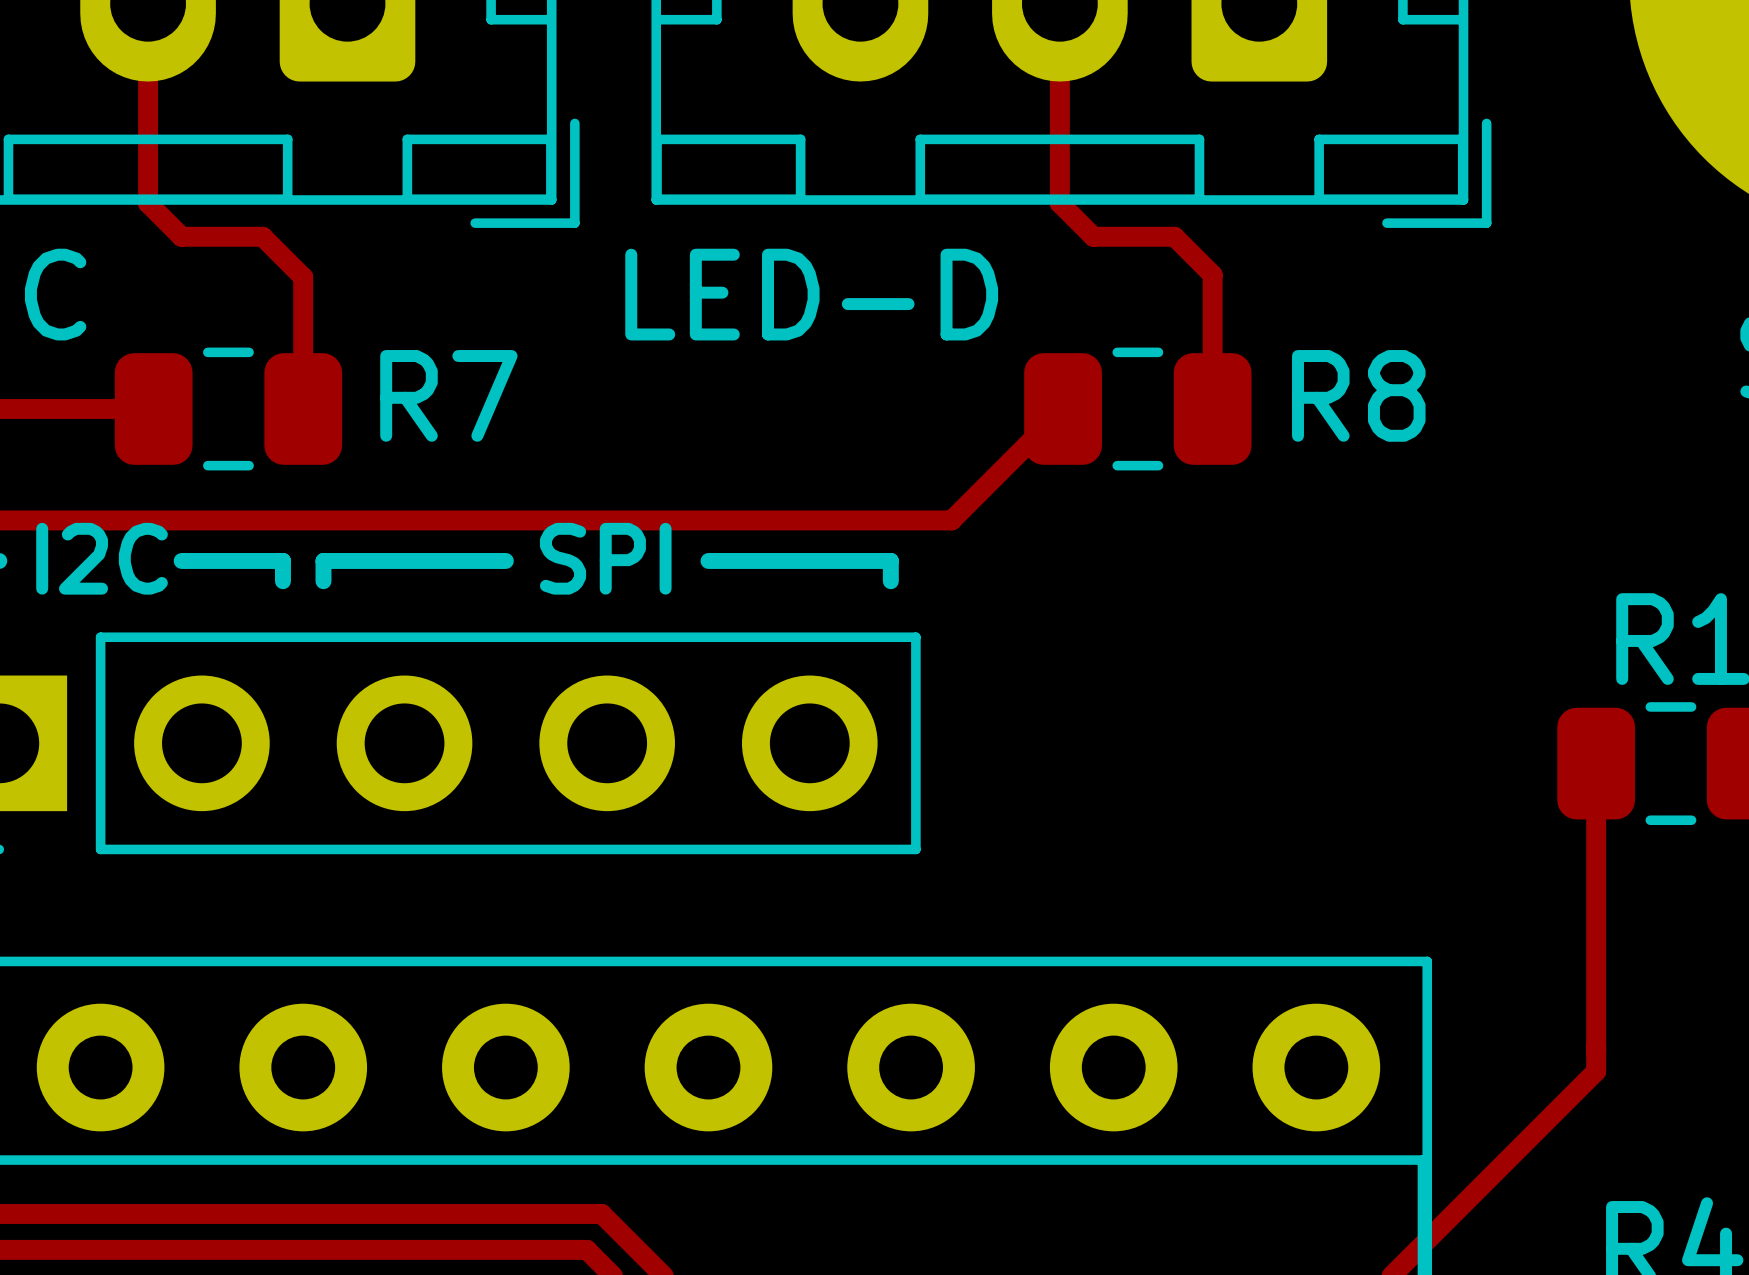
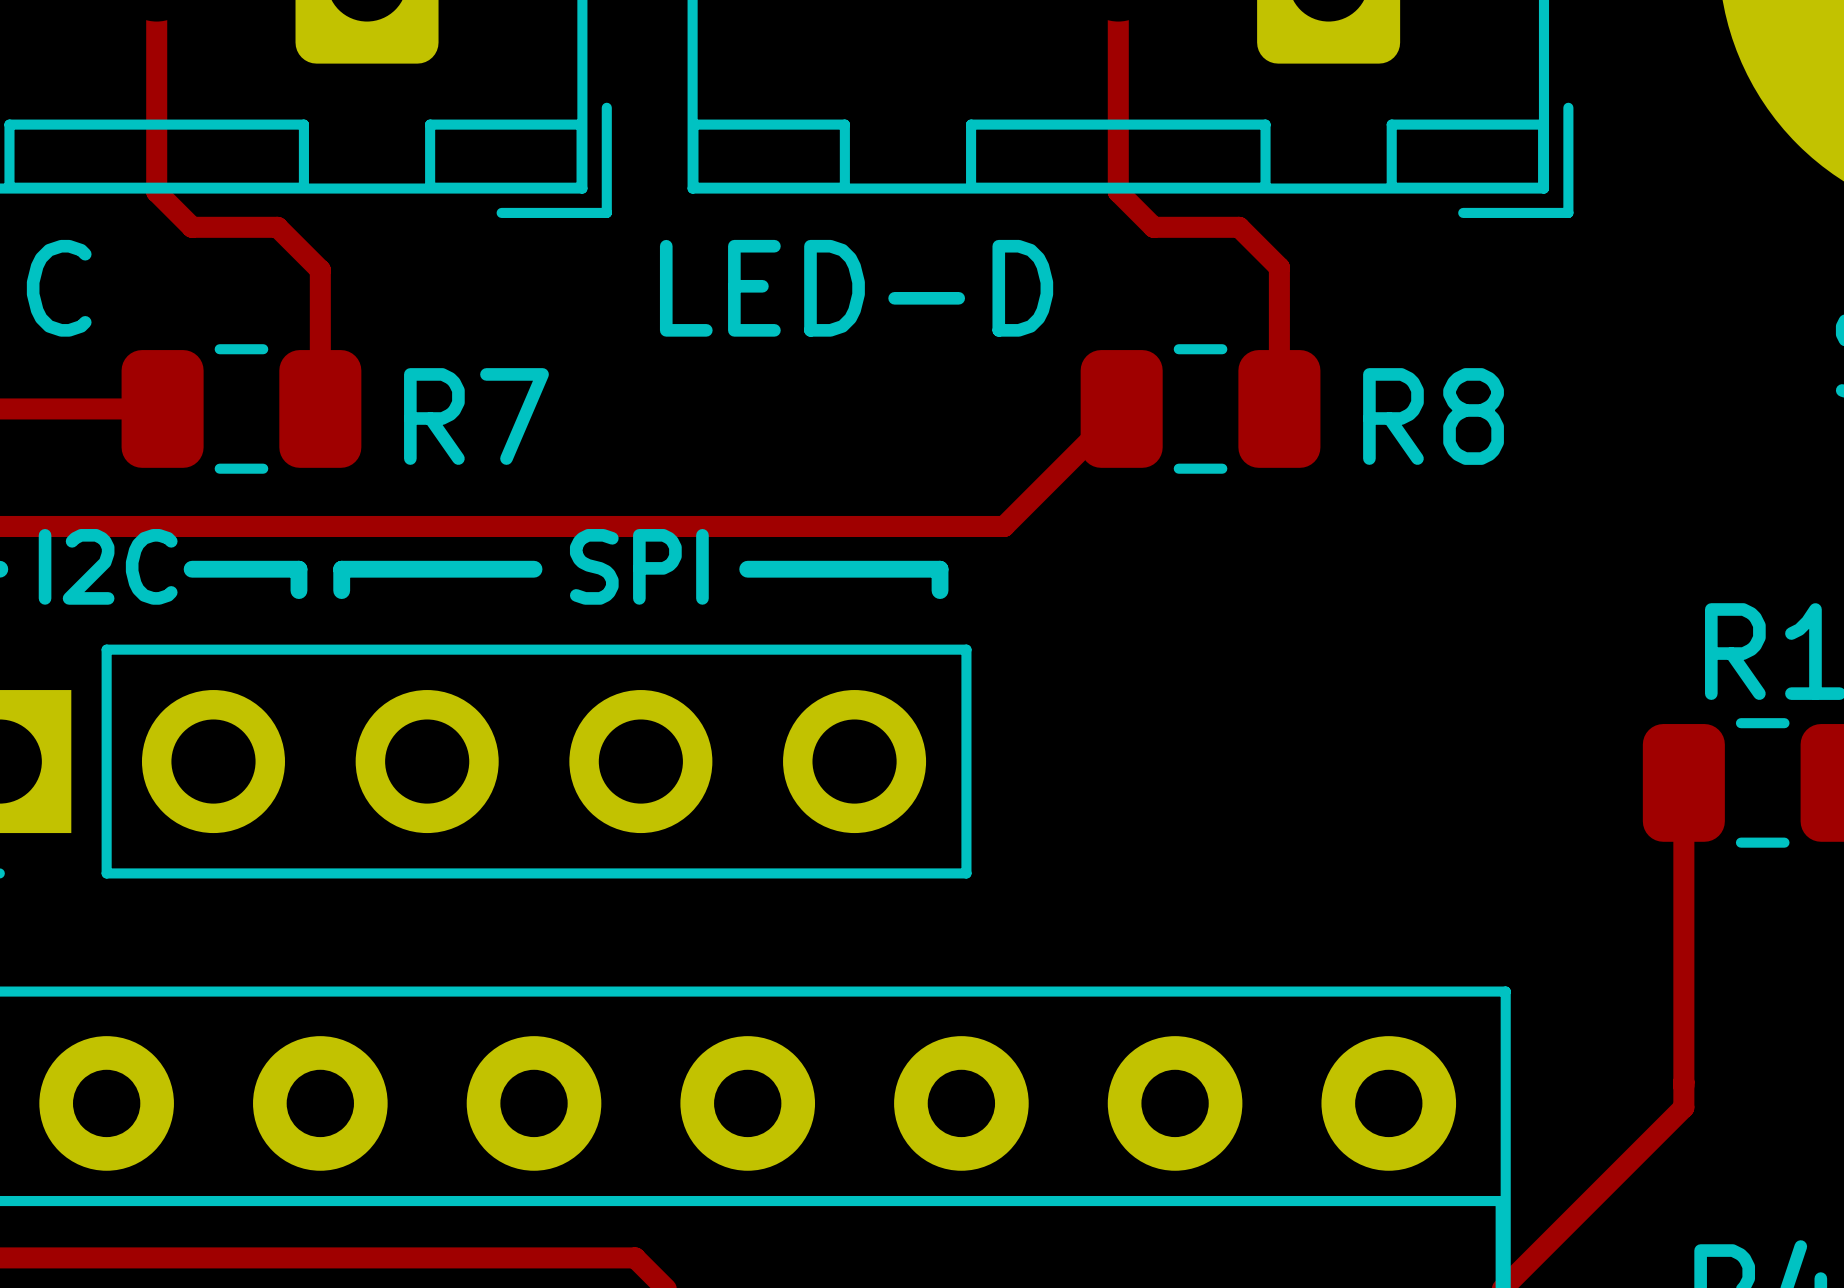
R7 name position: R7 (448, 395) -> R7 (476, 416)
R8 name position: R8 (1358, 395) -> R8 (1433, 416)

